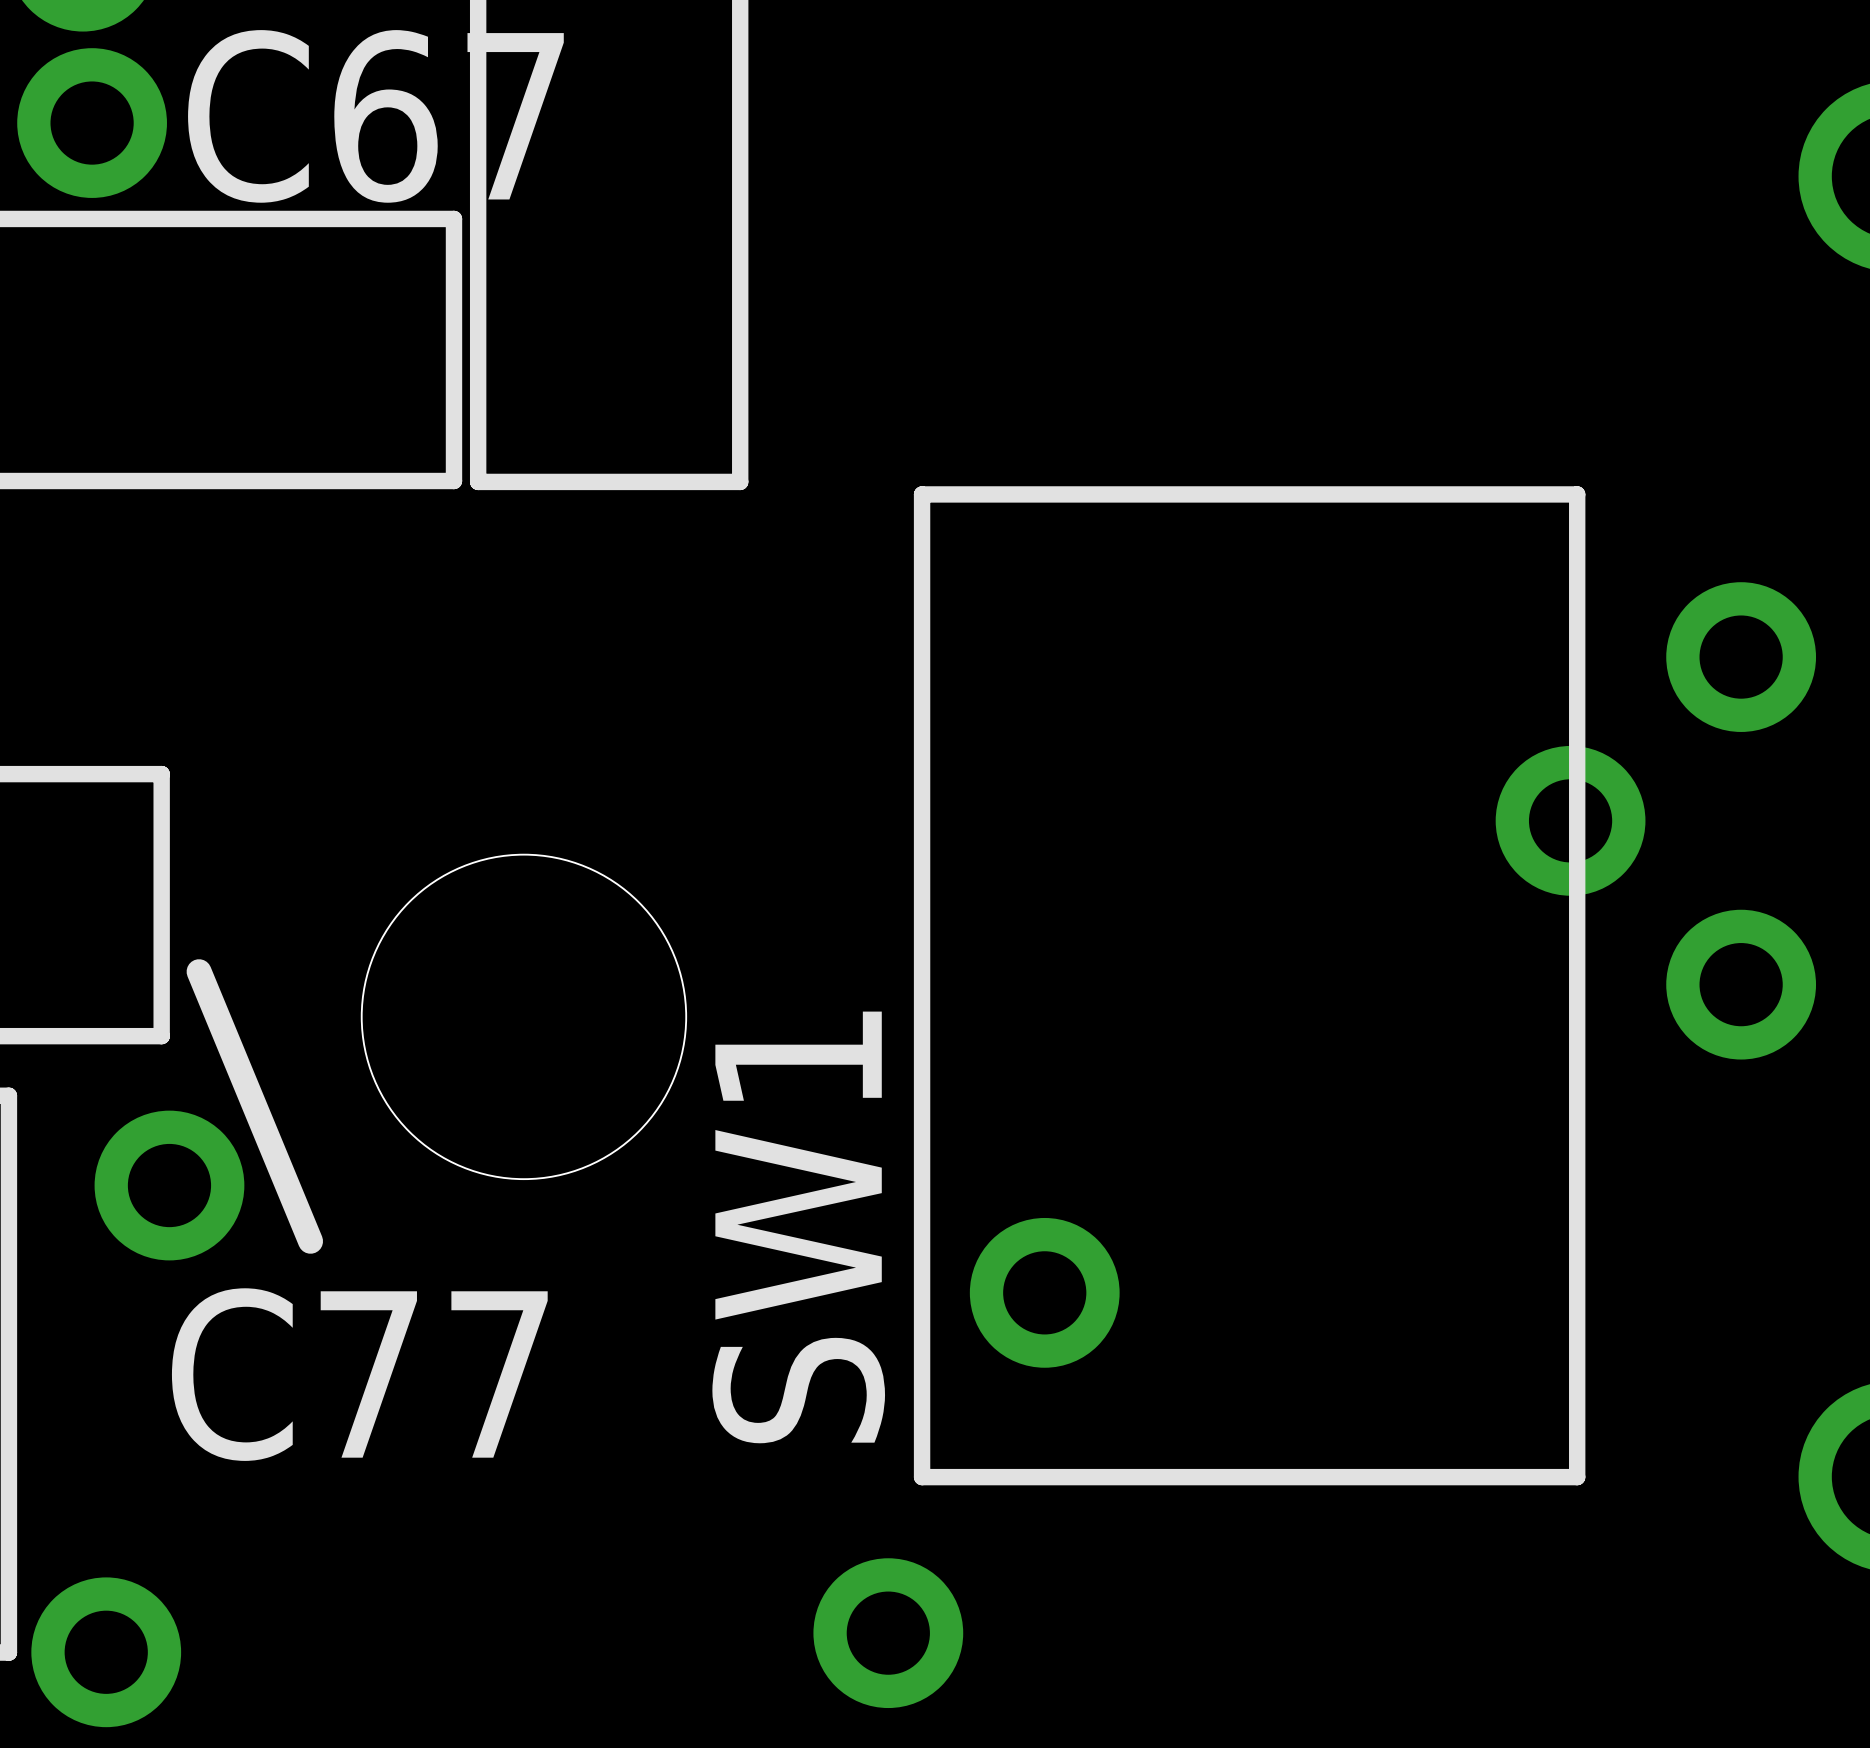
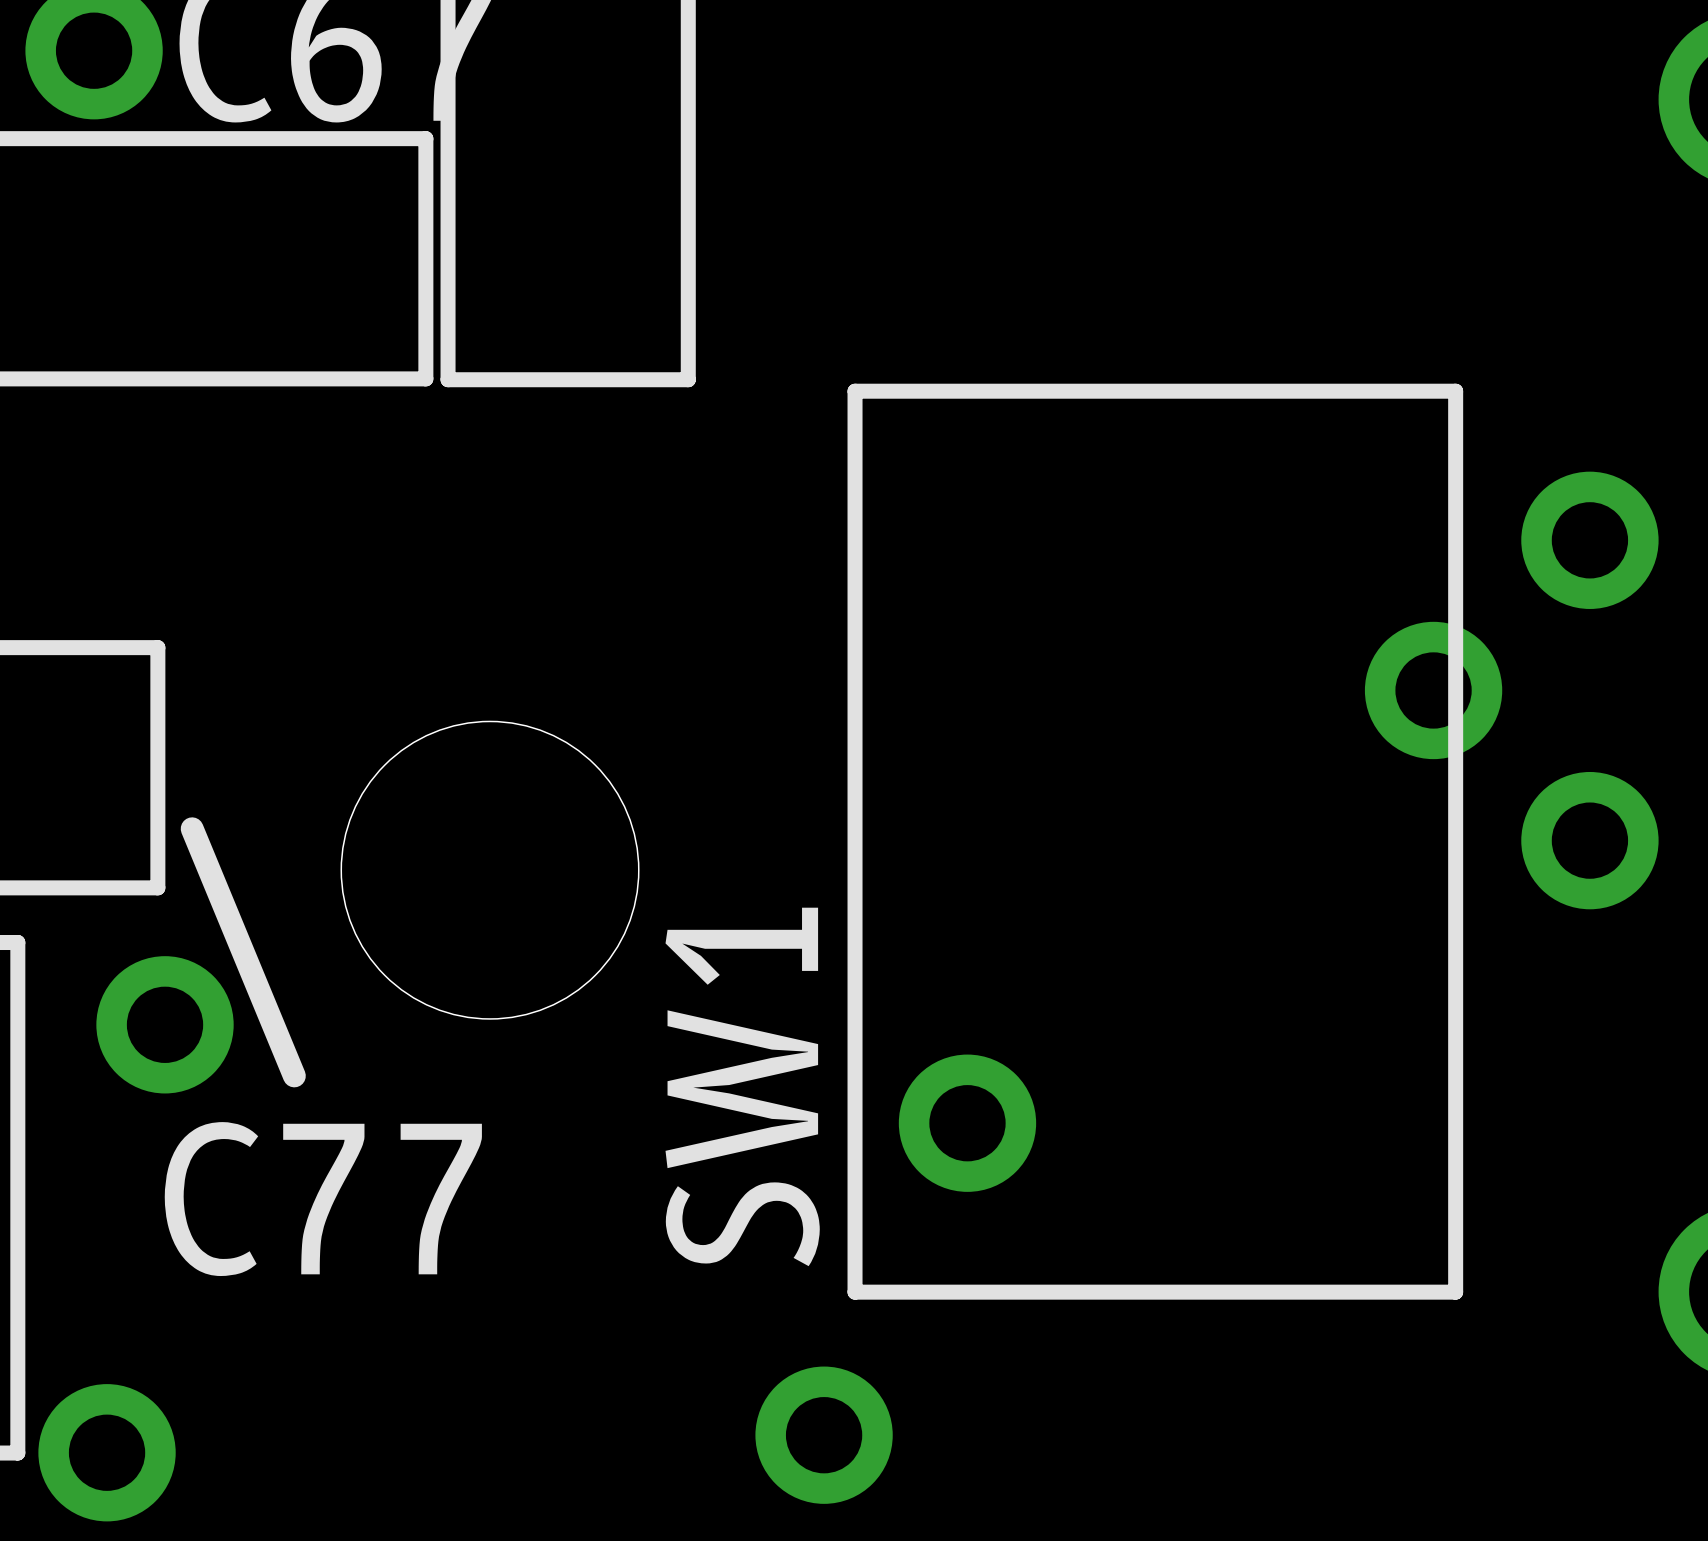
via position: (1741, 657) -> (1589, 540)
via position: (1570, 820) -> (1433, 690)
via position: (1741, 984) -> (1589, 840)

